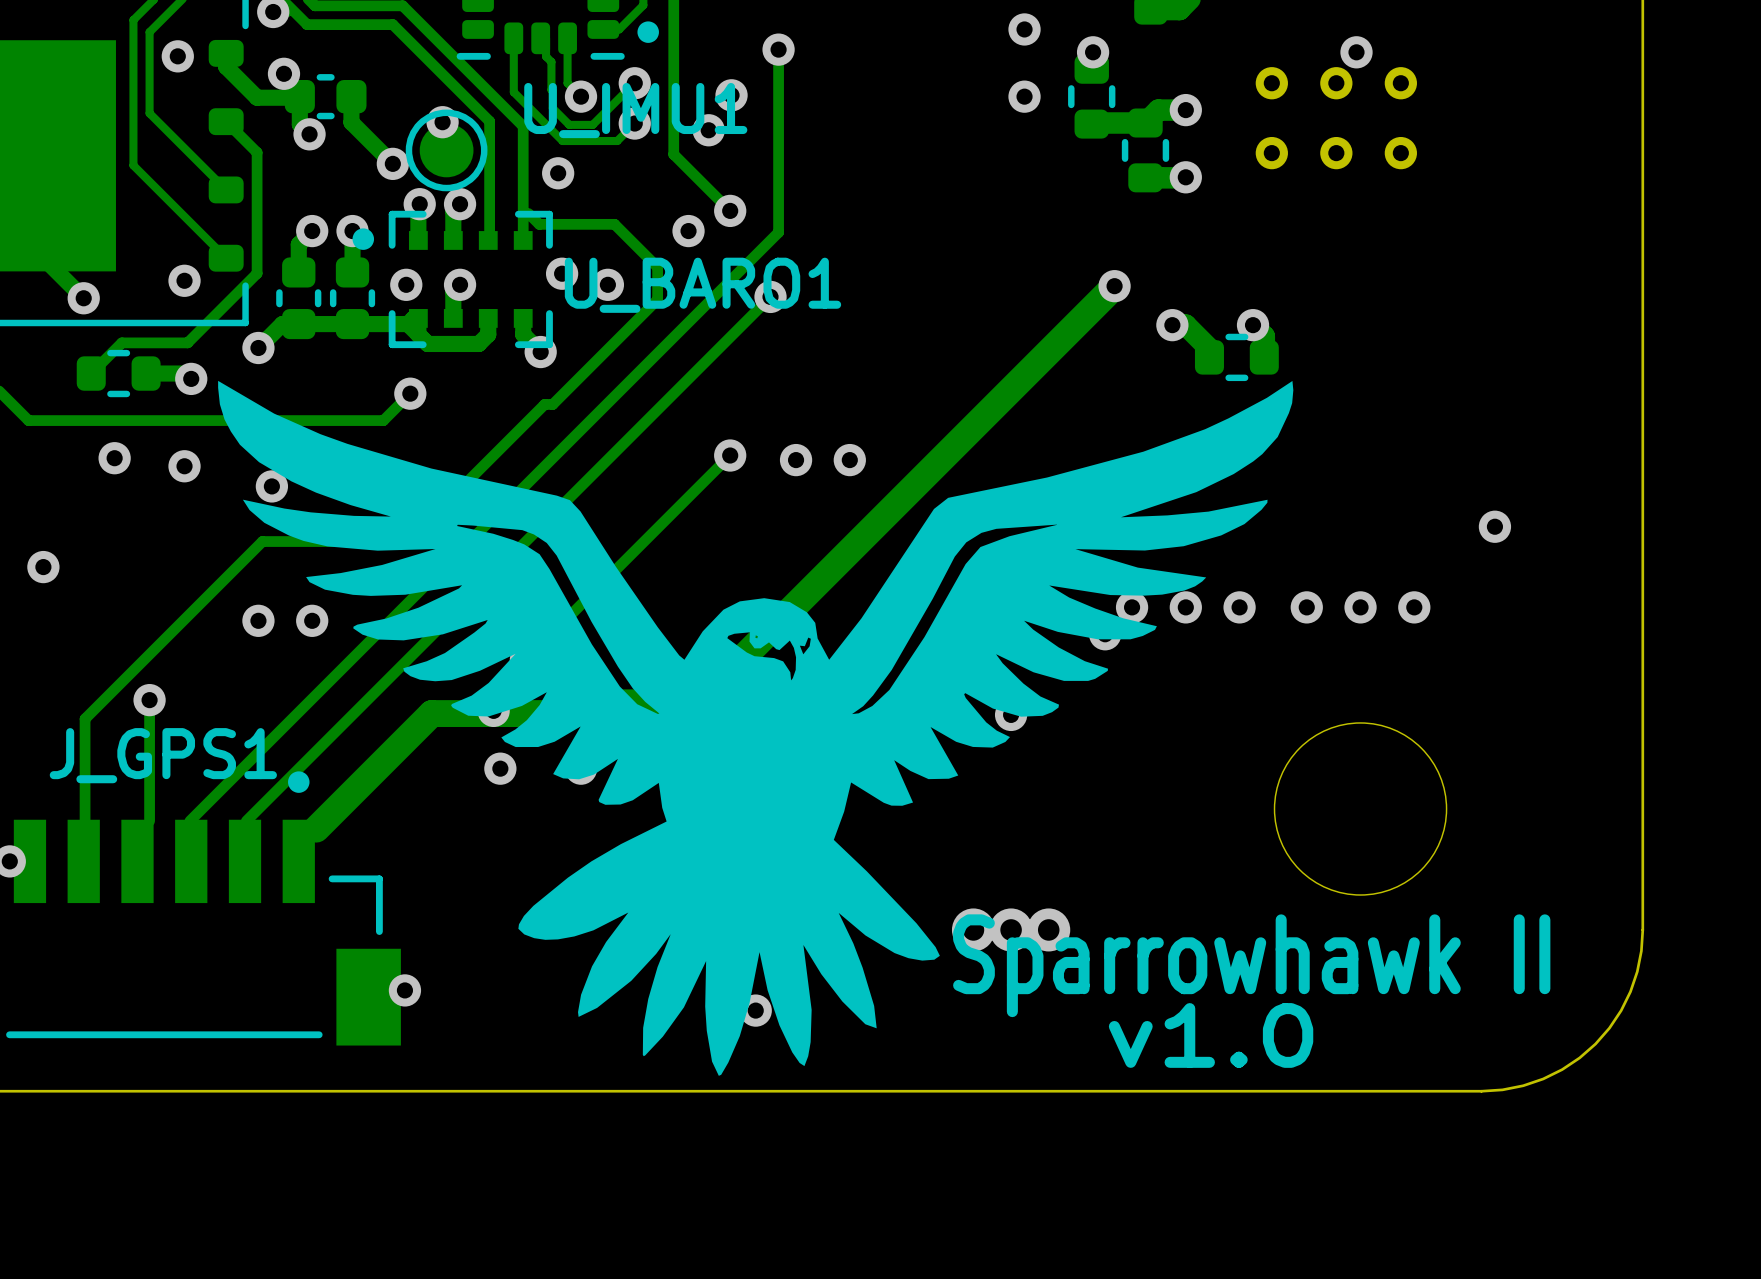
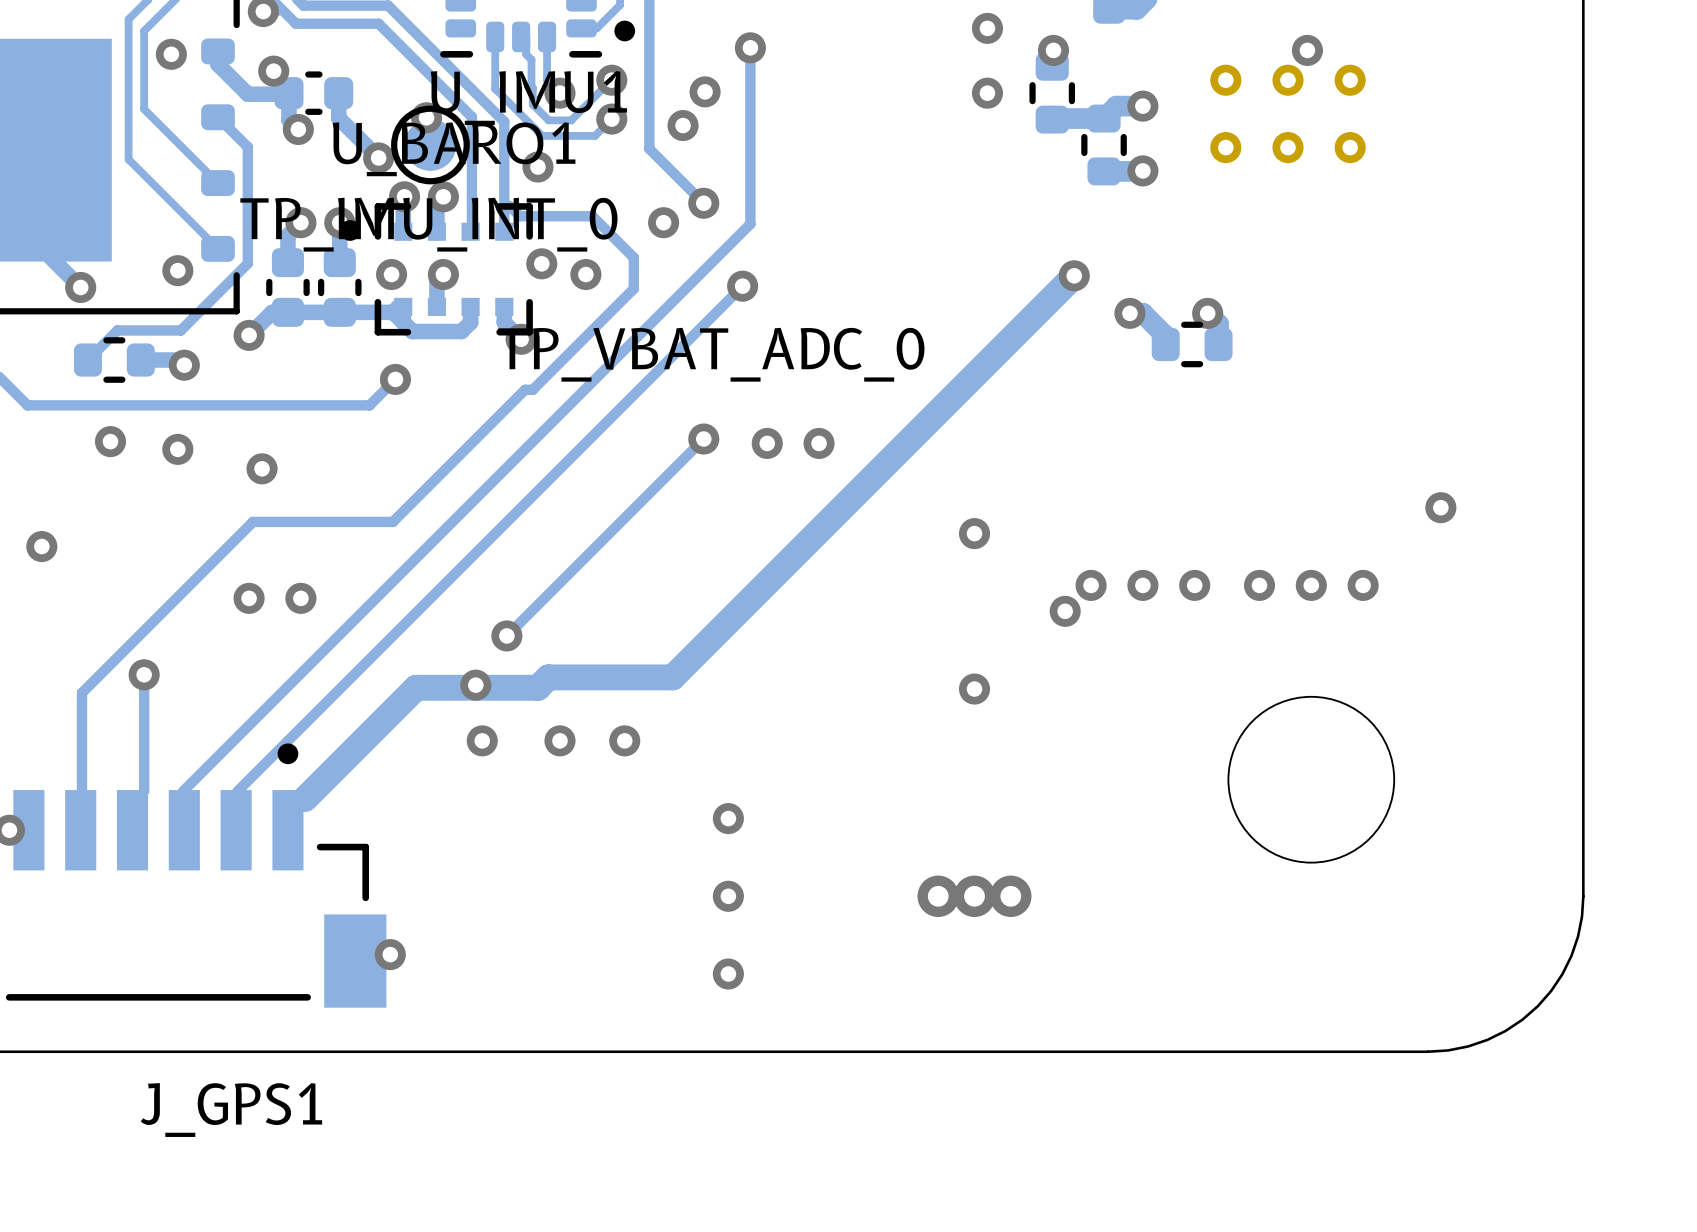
U_IMU1 name position: U_IMU1 (635, 110) -> U_IMU1 (528, 98)
TP_IMU_INT_0 name: none -> TP_IMU_INT_0 (428, 224)
U_BARO1 name position: U_BARO1 (702, 285) -> U_BARO1 (454, 149)
TP_VBAT_ADC_0: none -> (711, 354)
drawing: [218, 380, 1294, 1076] -> none
J_GPS1 name position: J_GPS1 (163, 755) -> J_GPS1 (231, 1110)
text: v1.0 (1211, 1035) -> none

